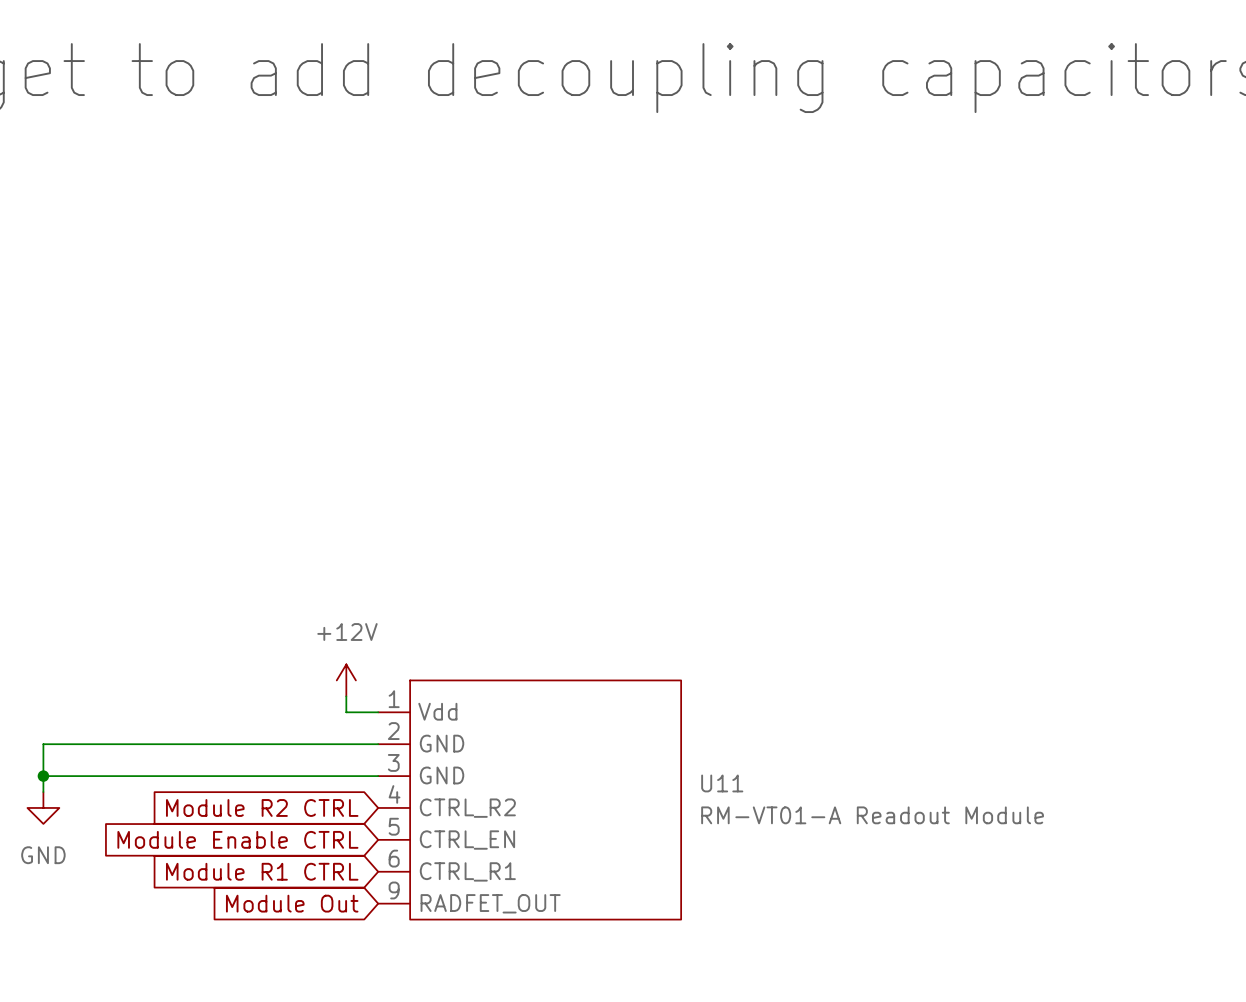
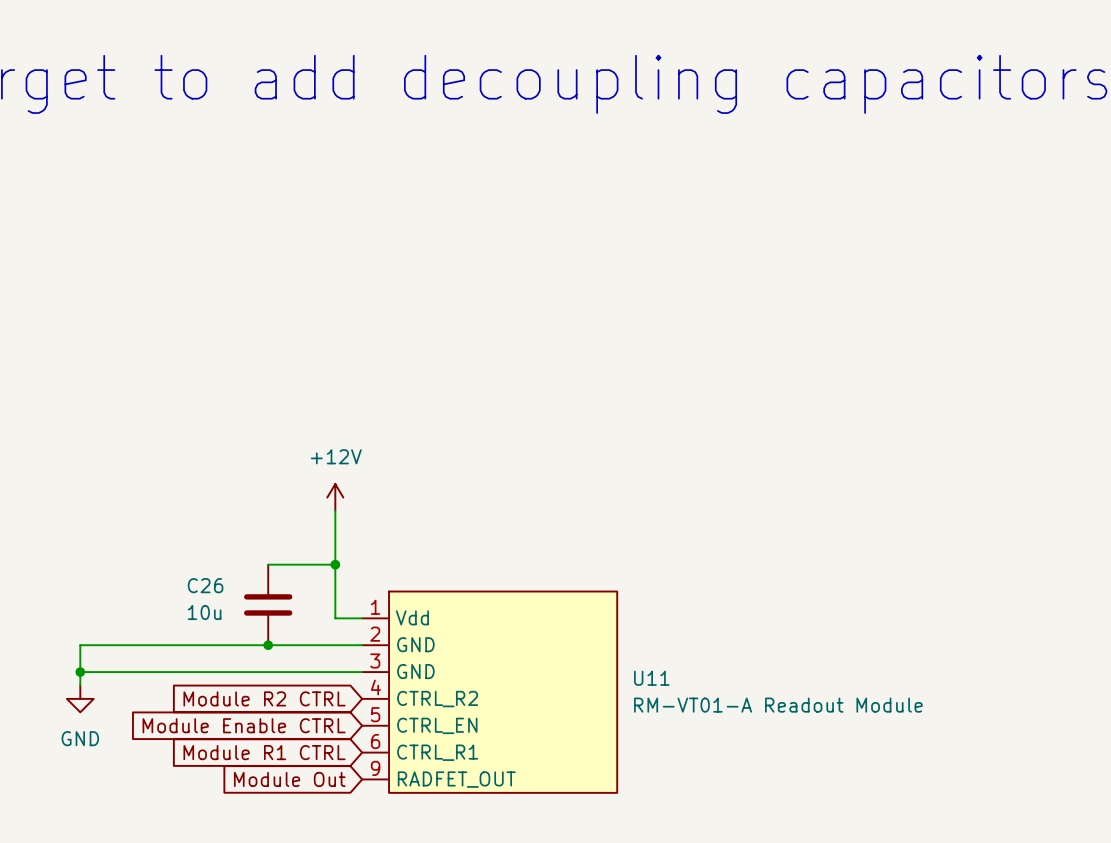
wire: none -> (335, 510) (335, 604)
wire: none -> (268, 564) (335, 564)
junction: none -> (335, 564)
power symbol position: +12V (346, 680) -> +12V (335, 497)
C26: none -> 10u (268, 604)
junction: none -> (268, 645)

